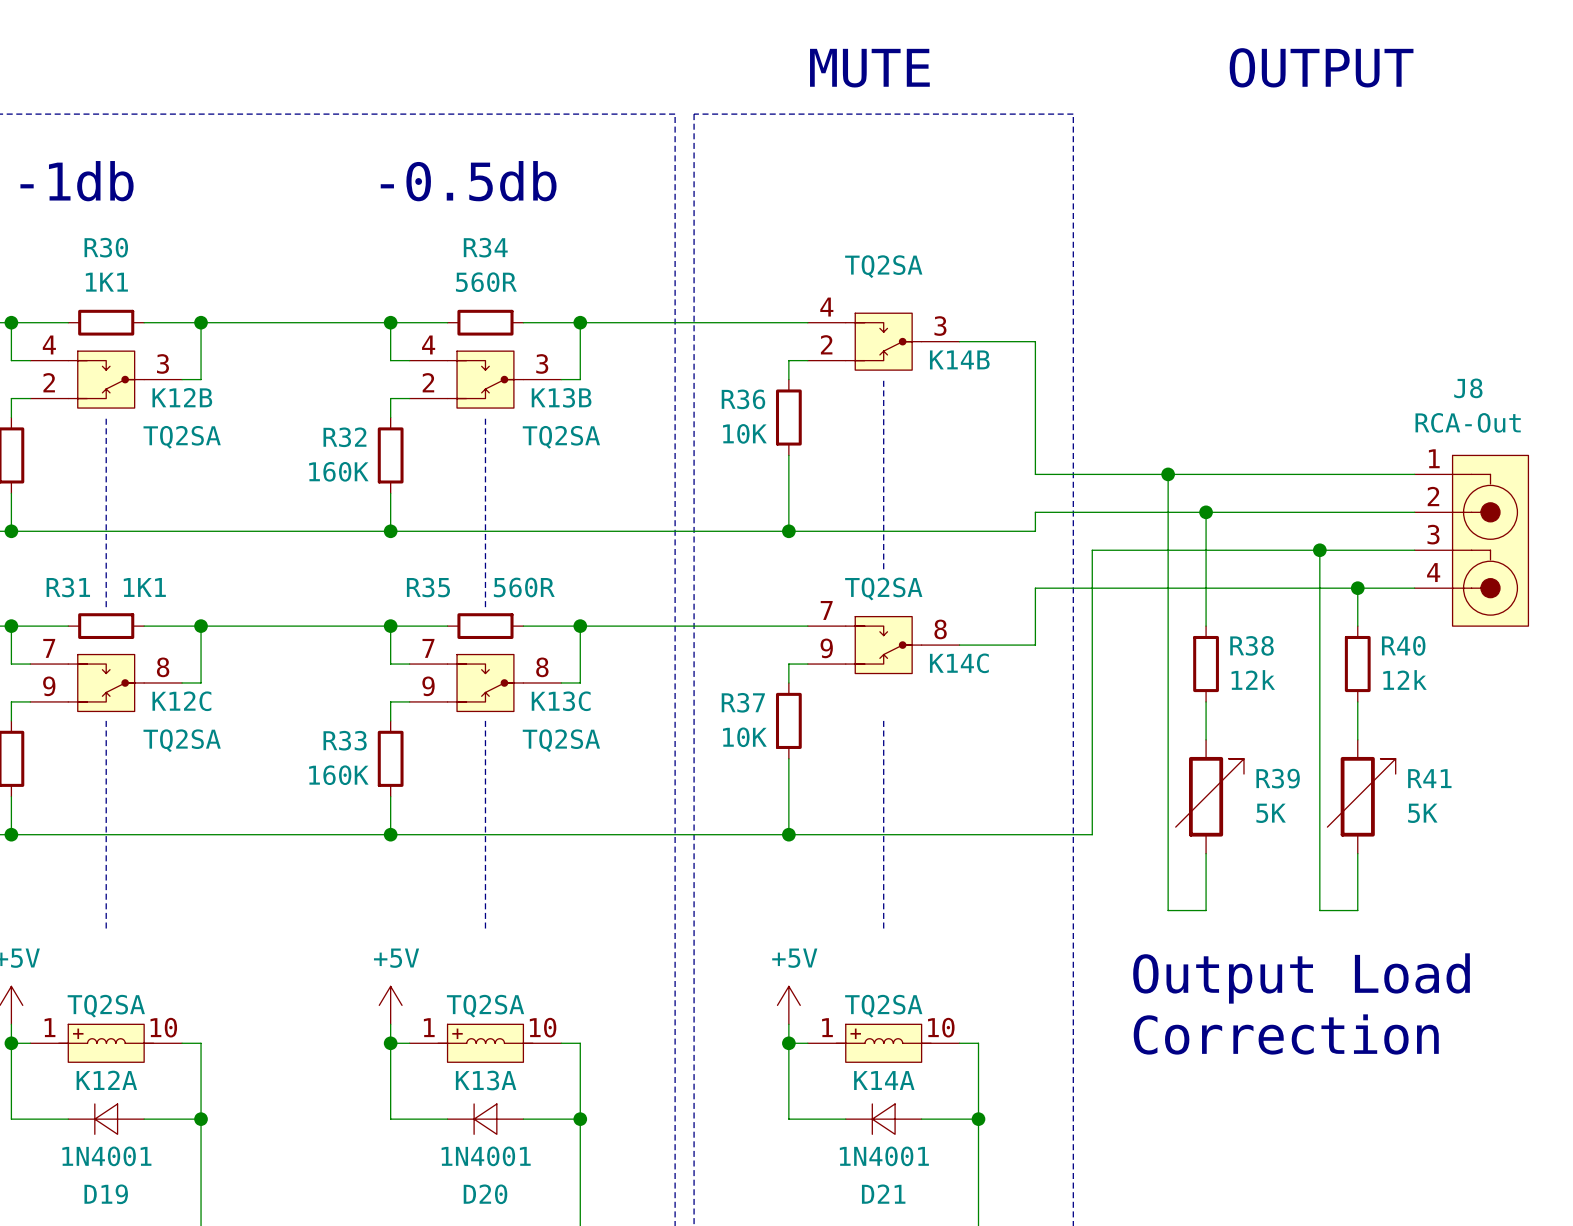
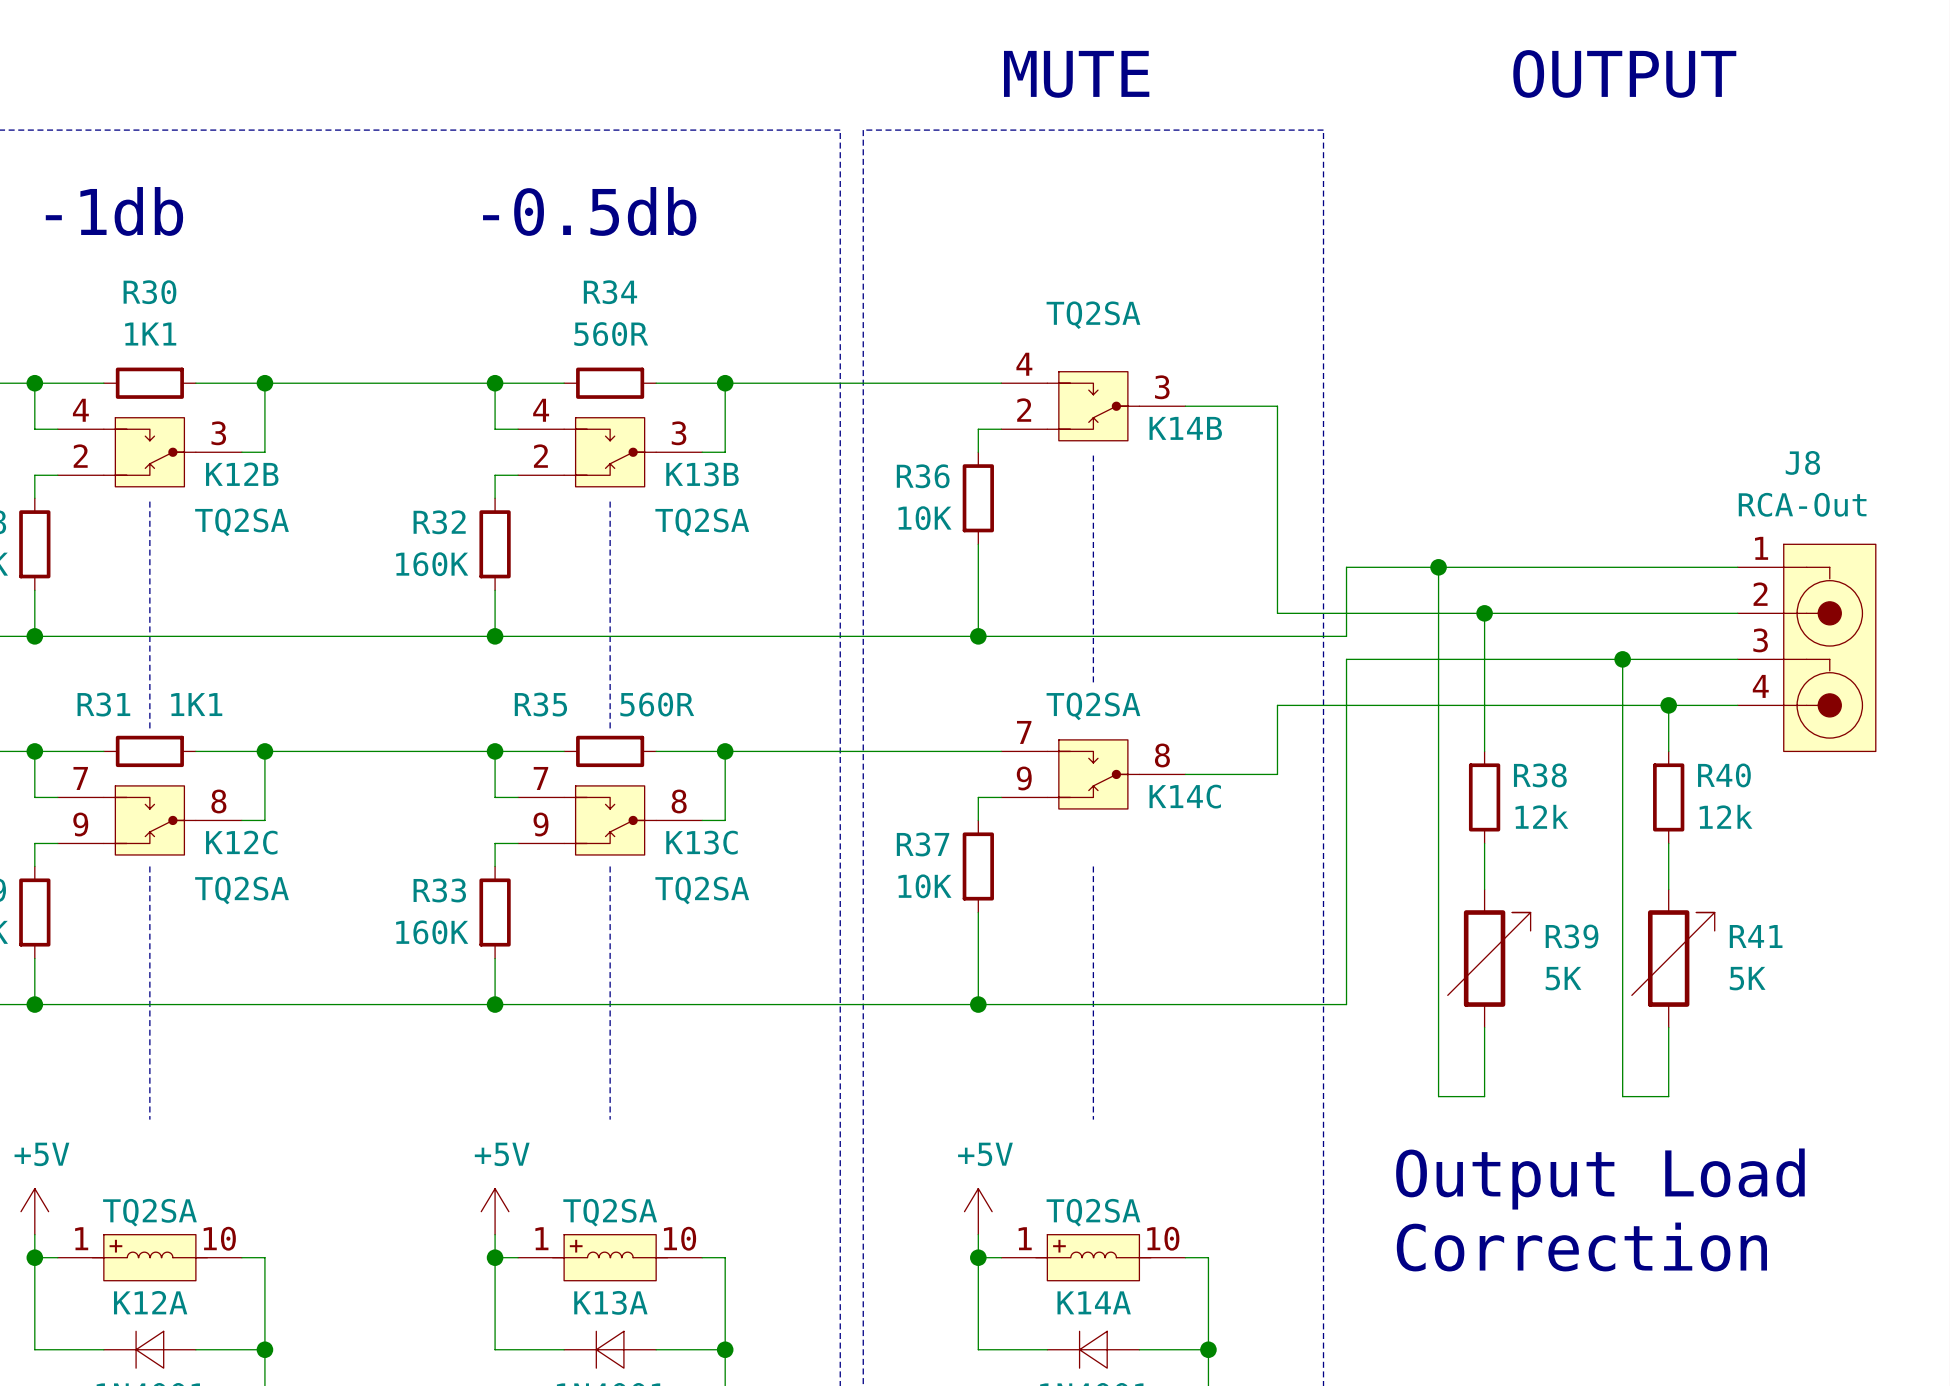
wire: (1035, 474) (1092, 474) -> (1277, 636) (1346, 636) (1346, 567)
wire: (1035, 512) (1035, 531) -> (1277, 613) (1277, 567)

